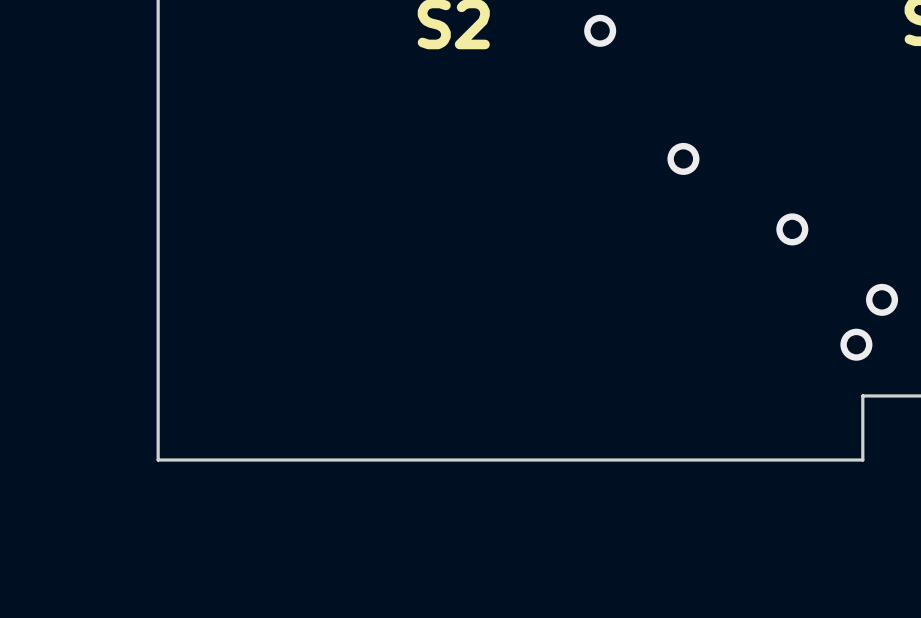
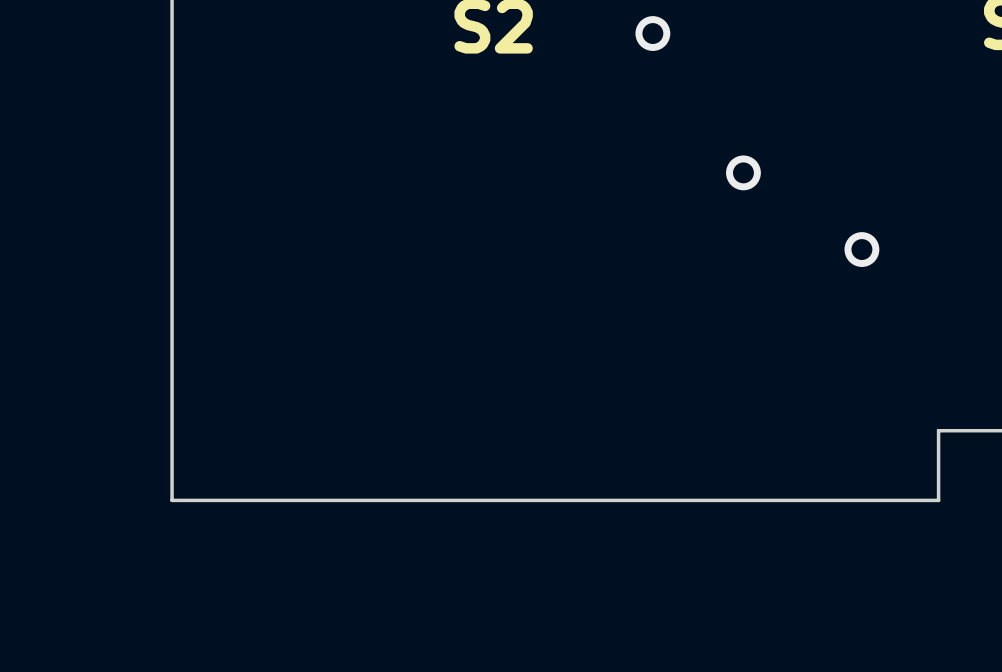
via: (882, 299) -> none
via: (856, 344) -> none

